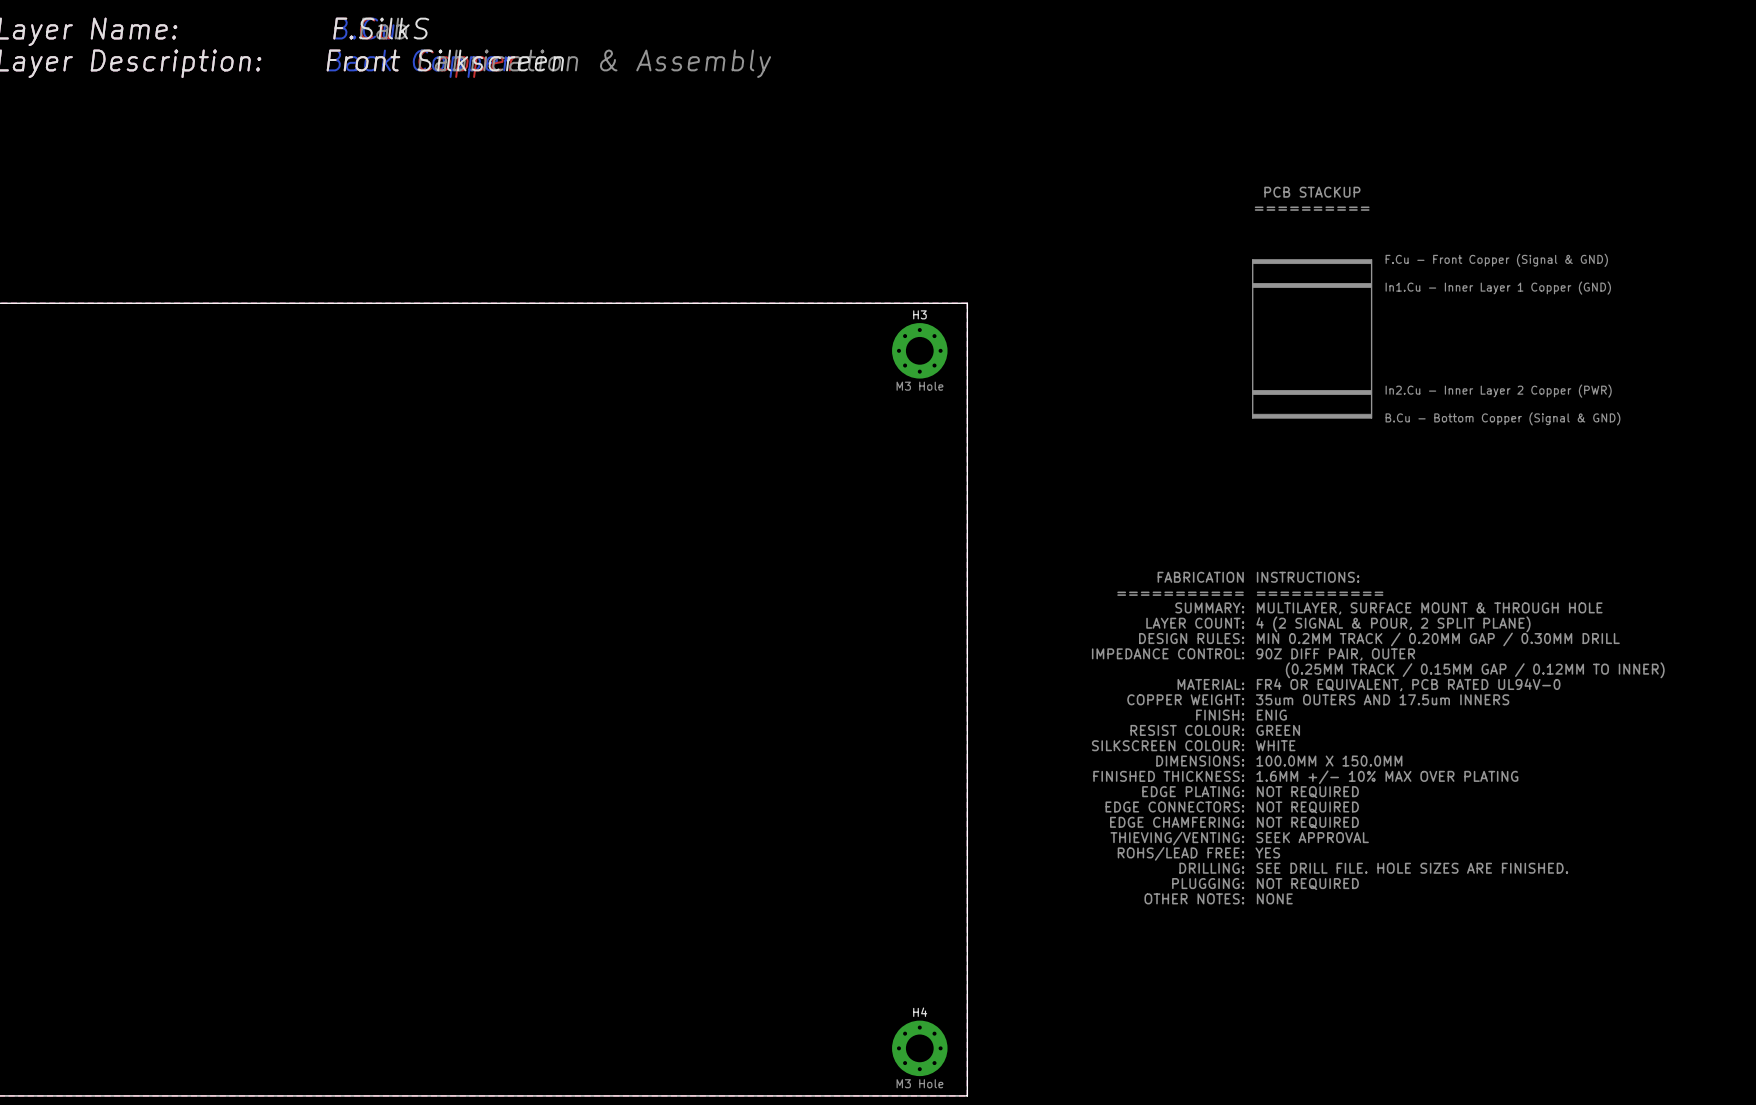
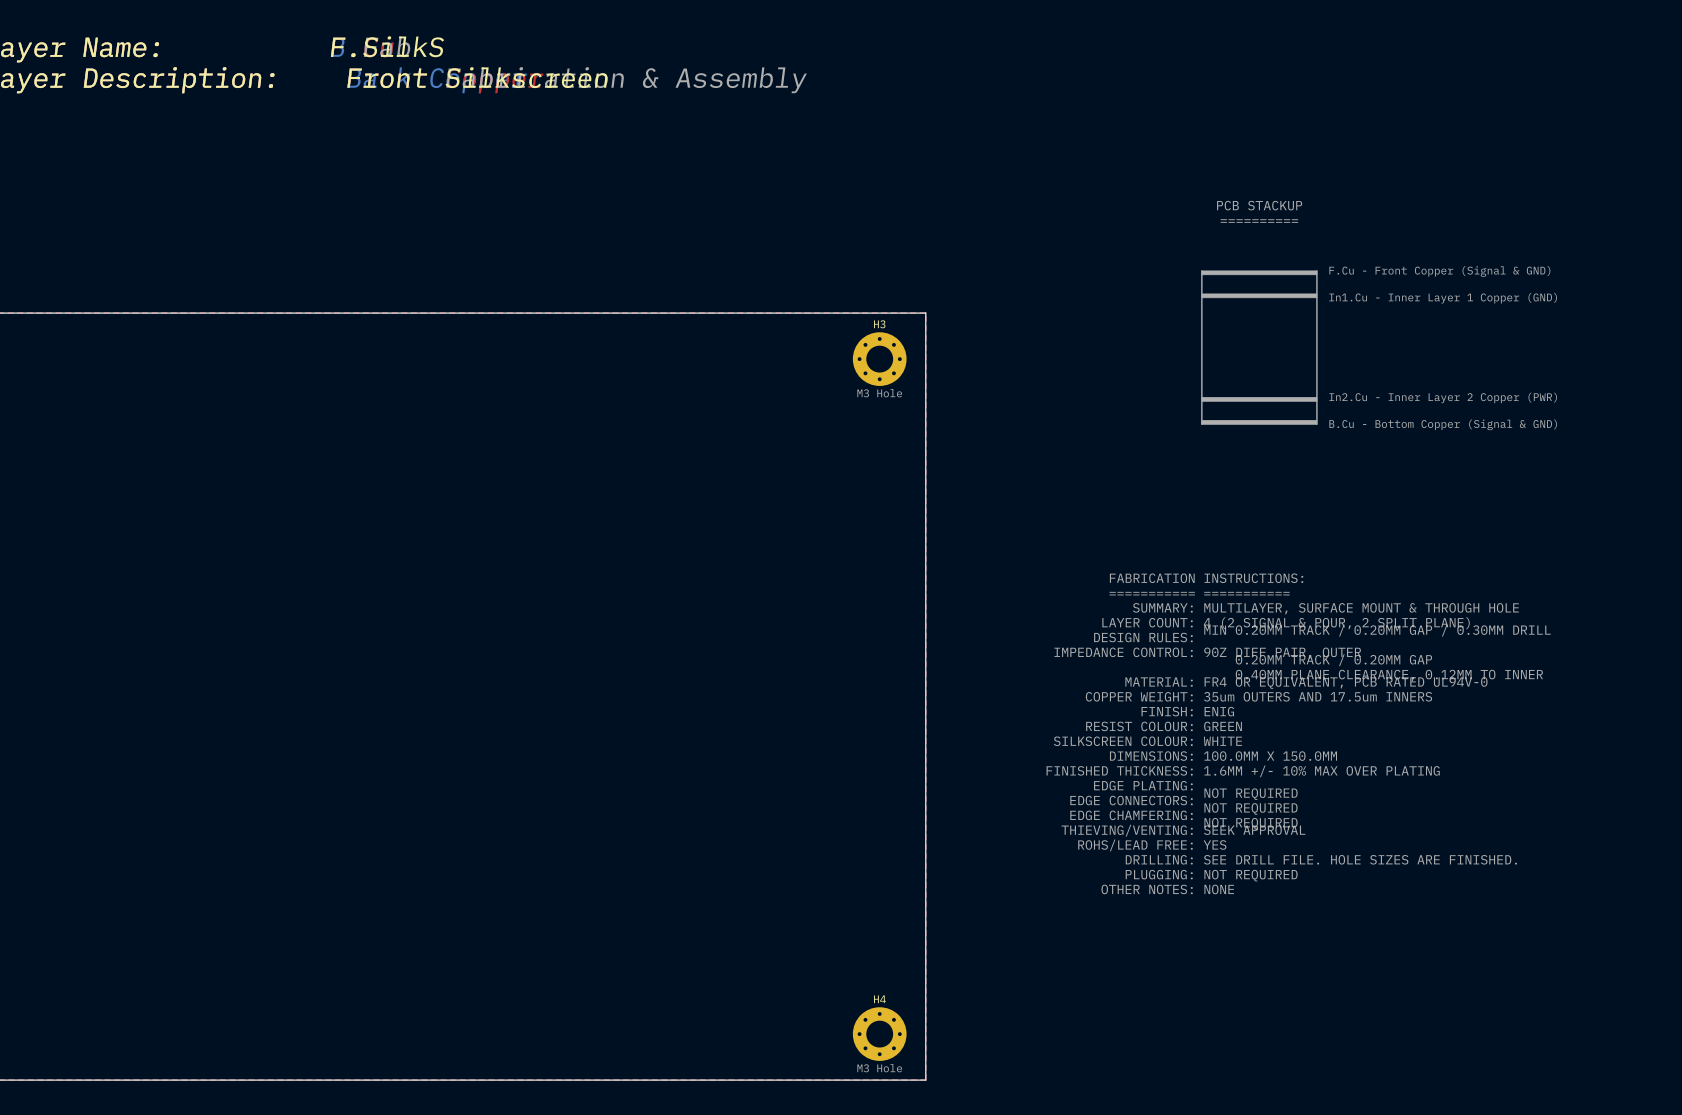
text: MIN 0.2MM TRACK / 0.20MM GAP / 0.30MM DRILL (1438, 639) -> MIN 0.20MM TRACK / 0.20MM GAP / 0.30MM DRILL (1377, 630)
text: none -> 0.20MM TRACK / 0.20MM GAP (1333, 660)
text: (0.25MM TRACK / 0.15MM GAP / 0.12MM TO INNER) (1475, 670) -> none
text: none -> 0.40MM PLANE CLEARANCE, 0.12MM TO INNER (1389, 675)
text: NOT REQUIRED (1307, 792) -> none
text: none -> NOT REQUIRED (1251, 794)
text: NOT REQUIRED (1307, 807) -> none
text: none -> NOT REQUIRED (1251, 808)
text: NOT REQUIRED (1307, 822) -> none
text: none -> NOT REQUIRED (1251, 823)

